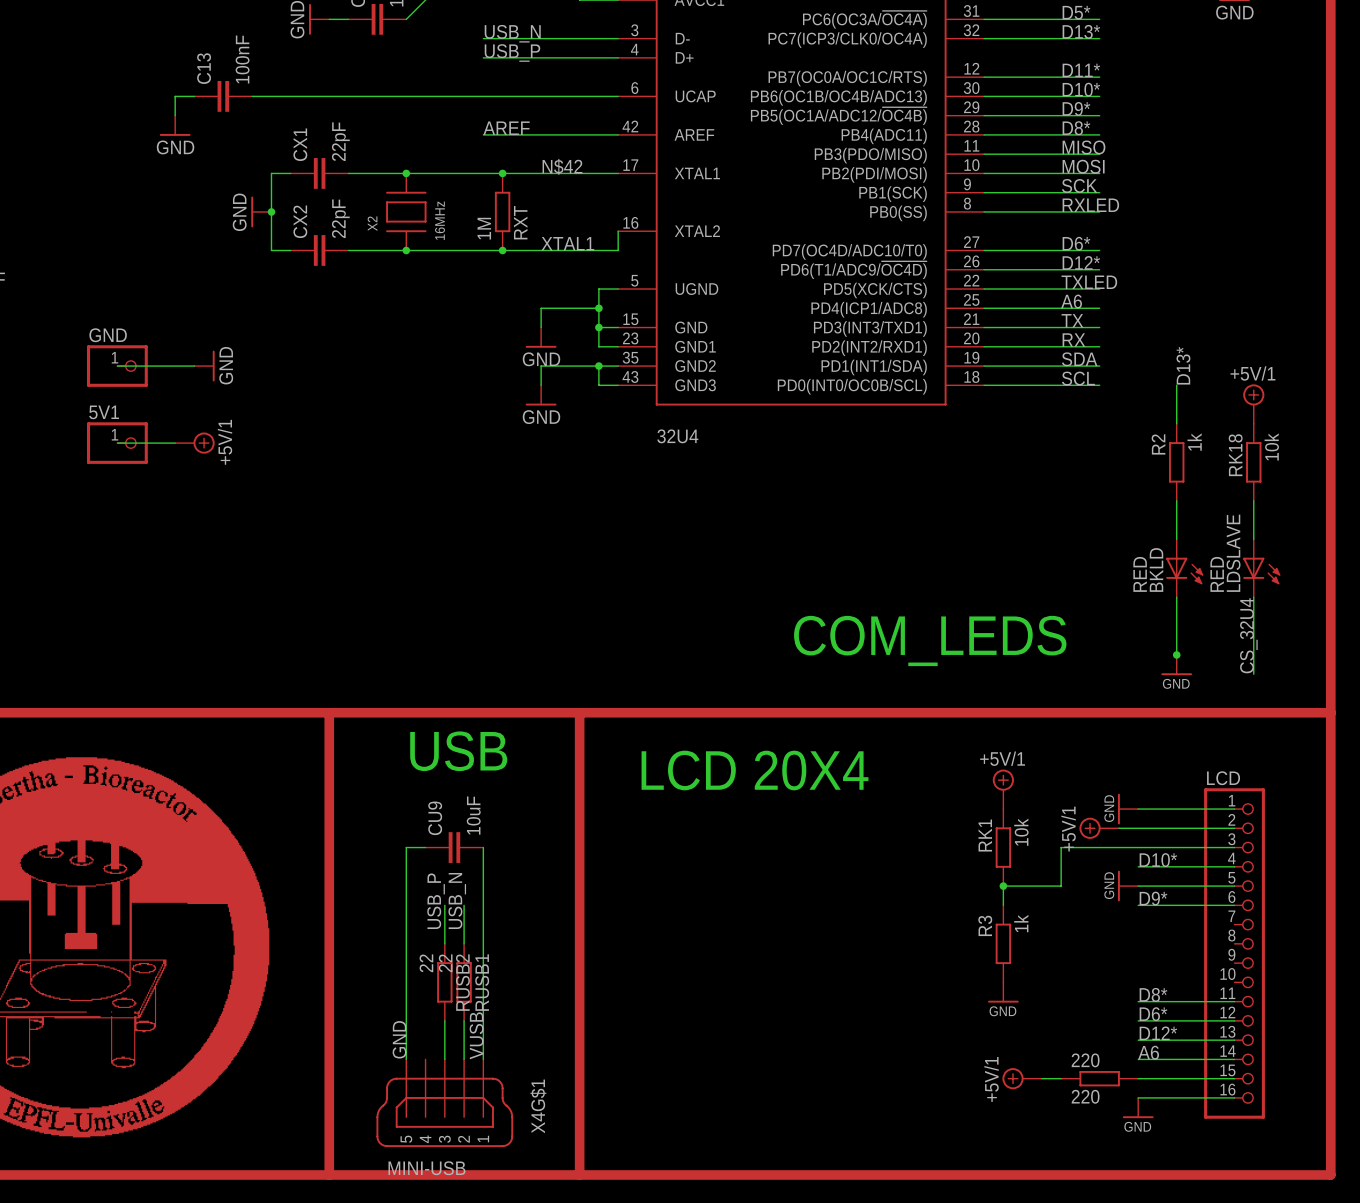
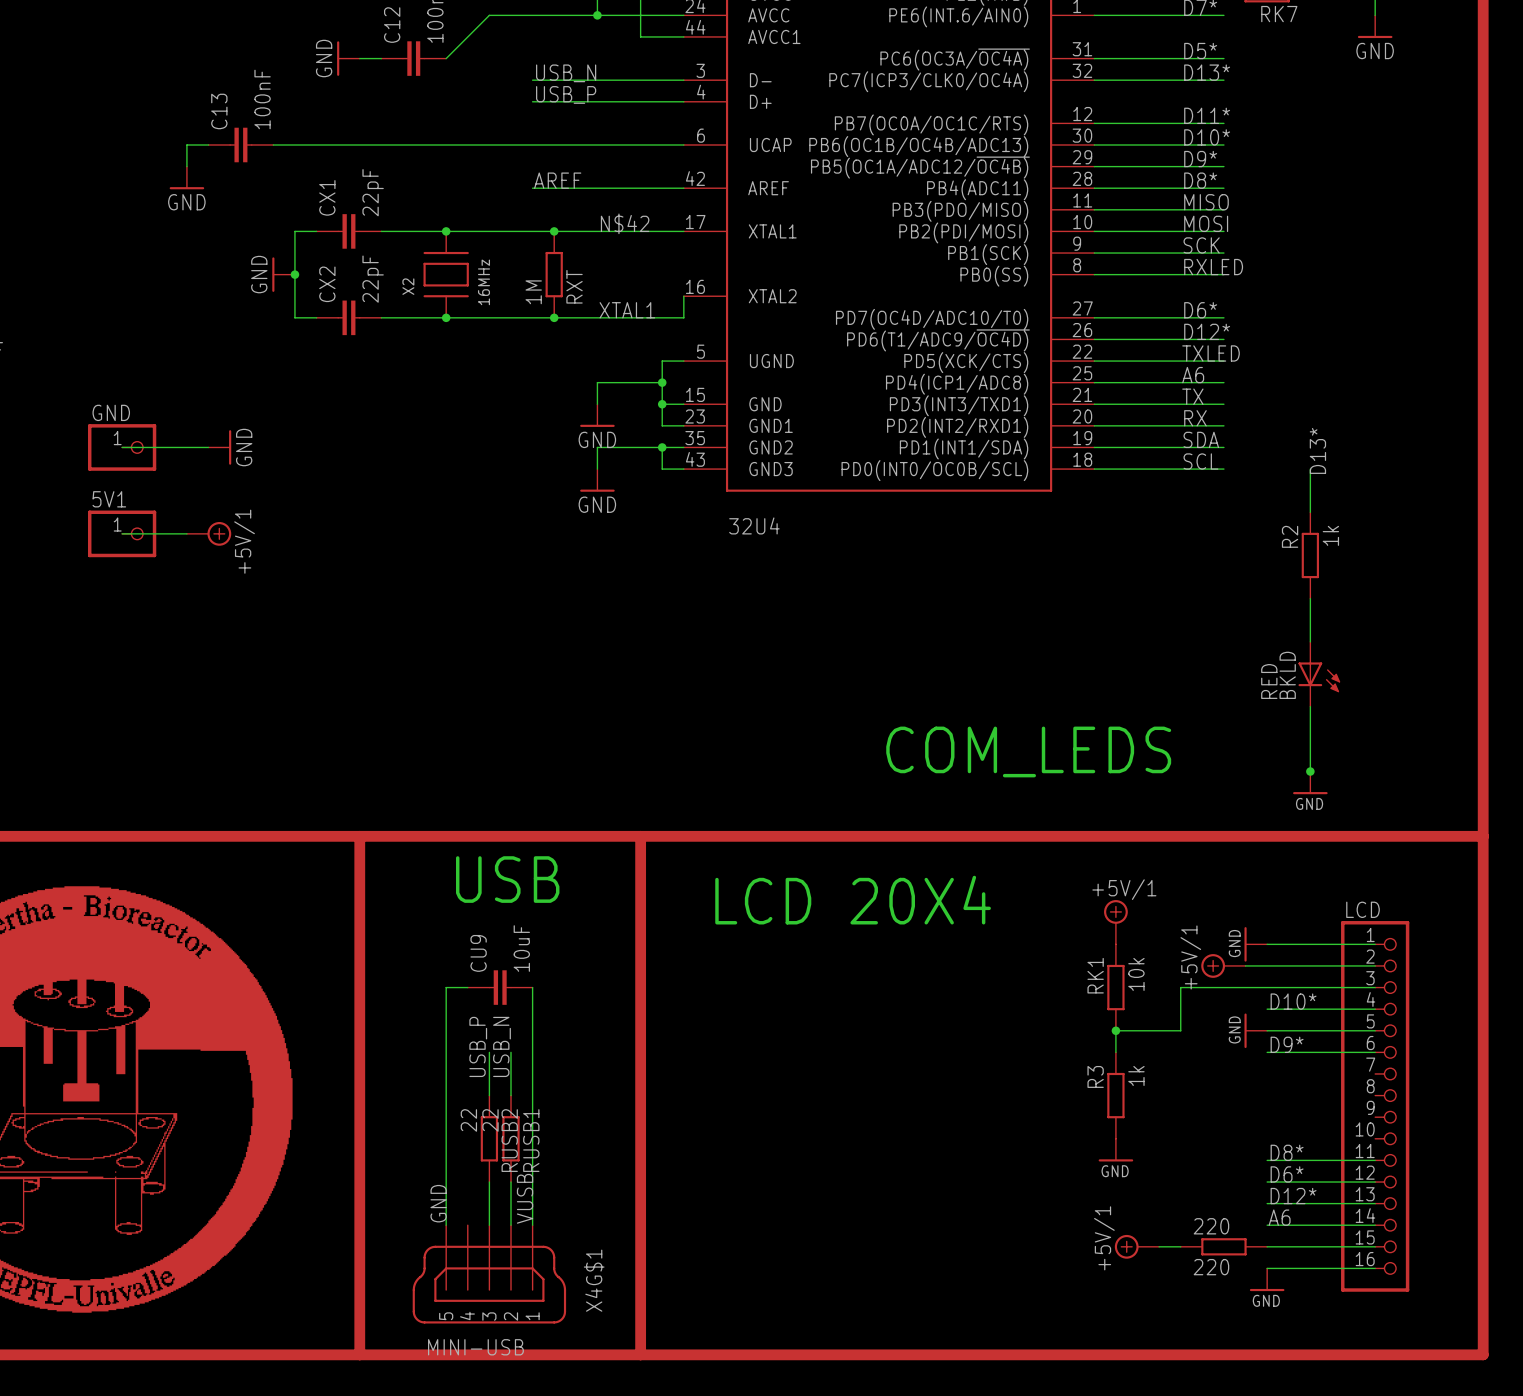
power symbol: +5V/1 (1253, 404) -> none
RK18: 10k (1253, 462) -> none
wire: (1253, 500) (1253, 539) -> none
LDSLAVE: RED (1261, 568) -> none
wire: (1253, 597) (1253, 674) -> none
label: CS_32U4 (1248, 635) -> none

